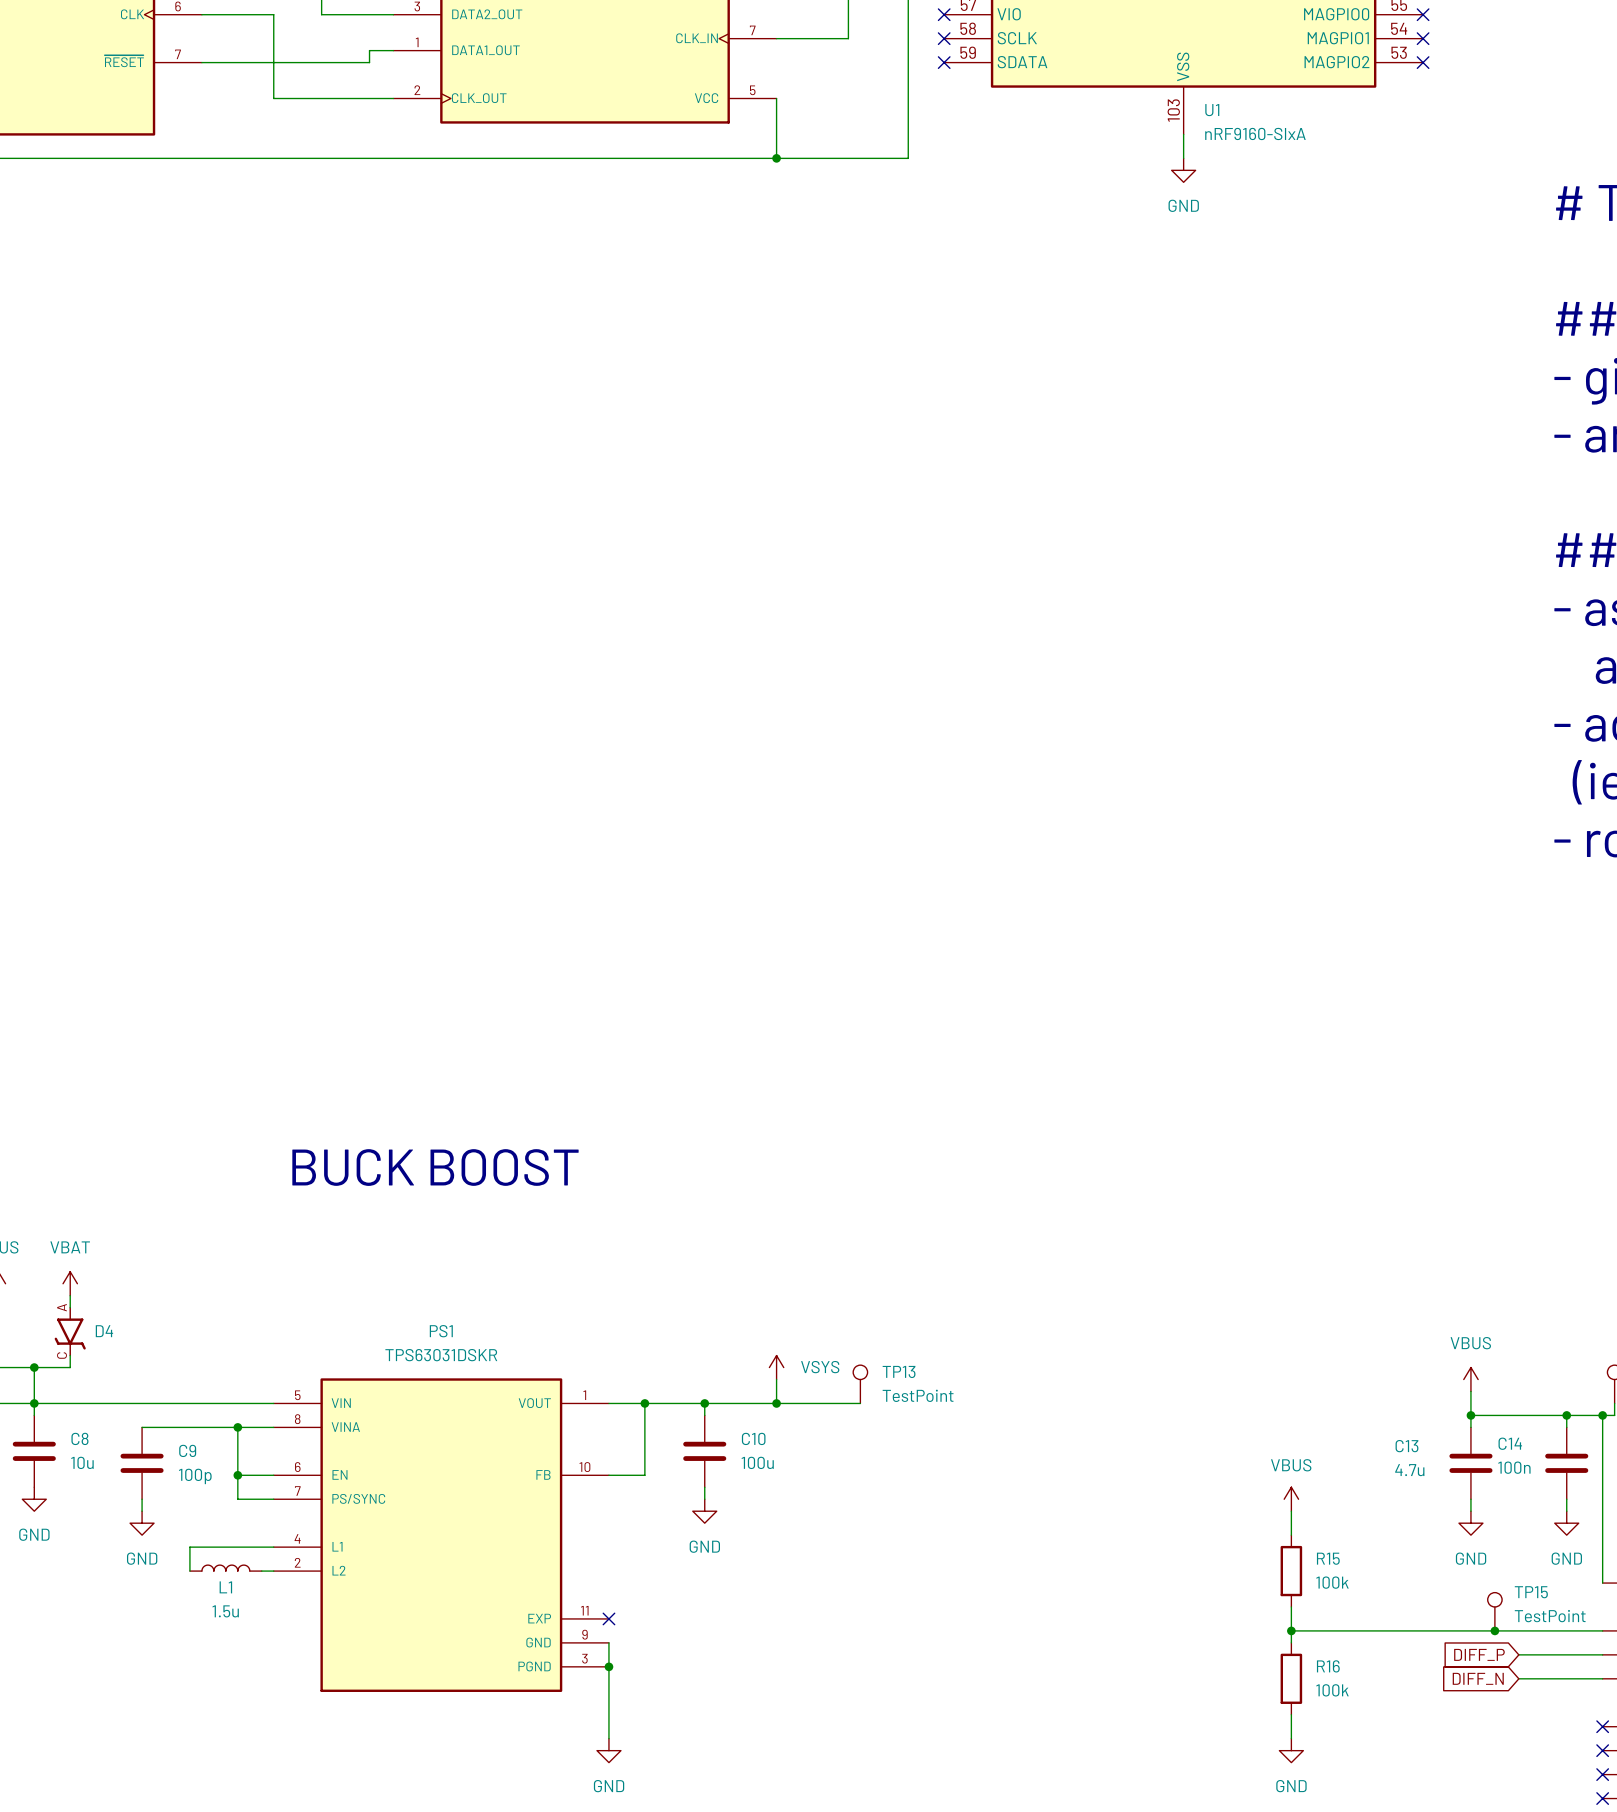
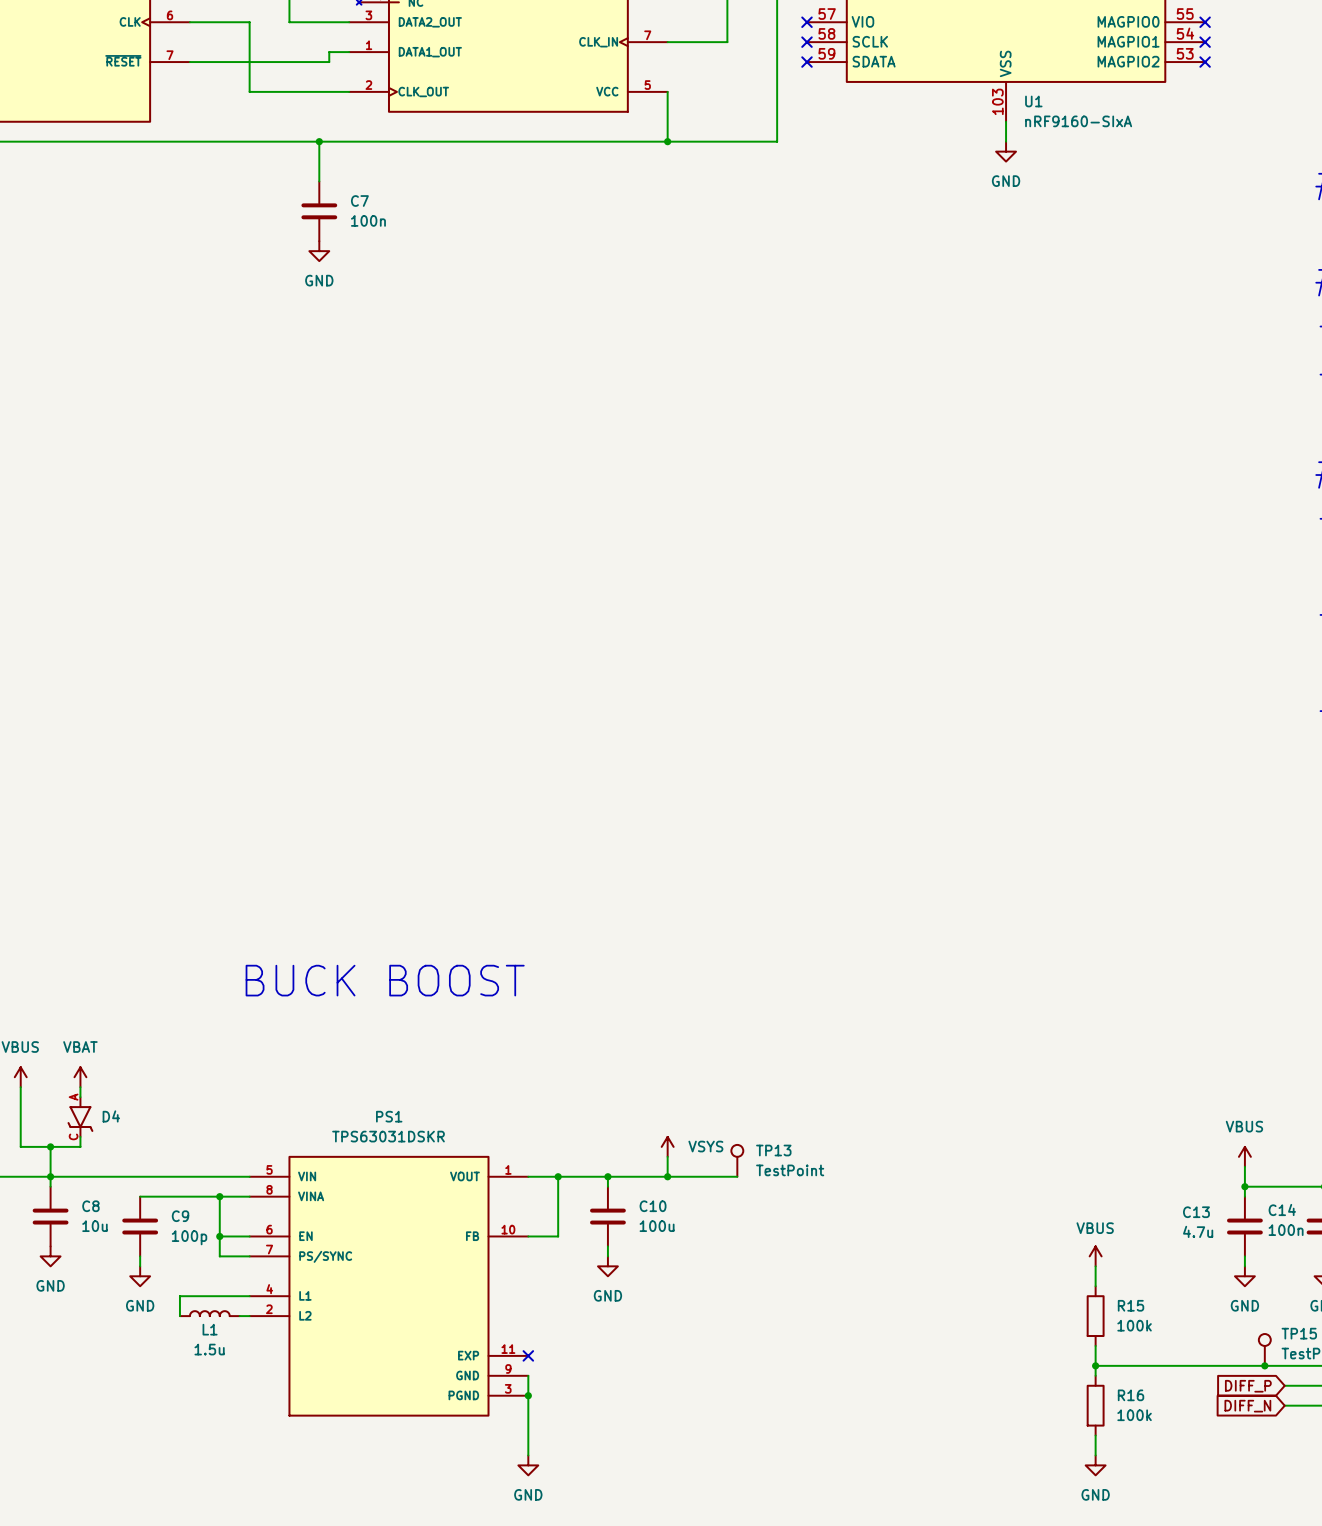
wire: none -> (319, 141) (319, 181)
junction: none -> (319, 141)
C7: none -> 100n (319, 211)
power symbol: none -> GND (319, 251)

